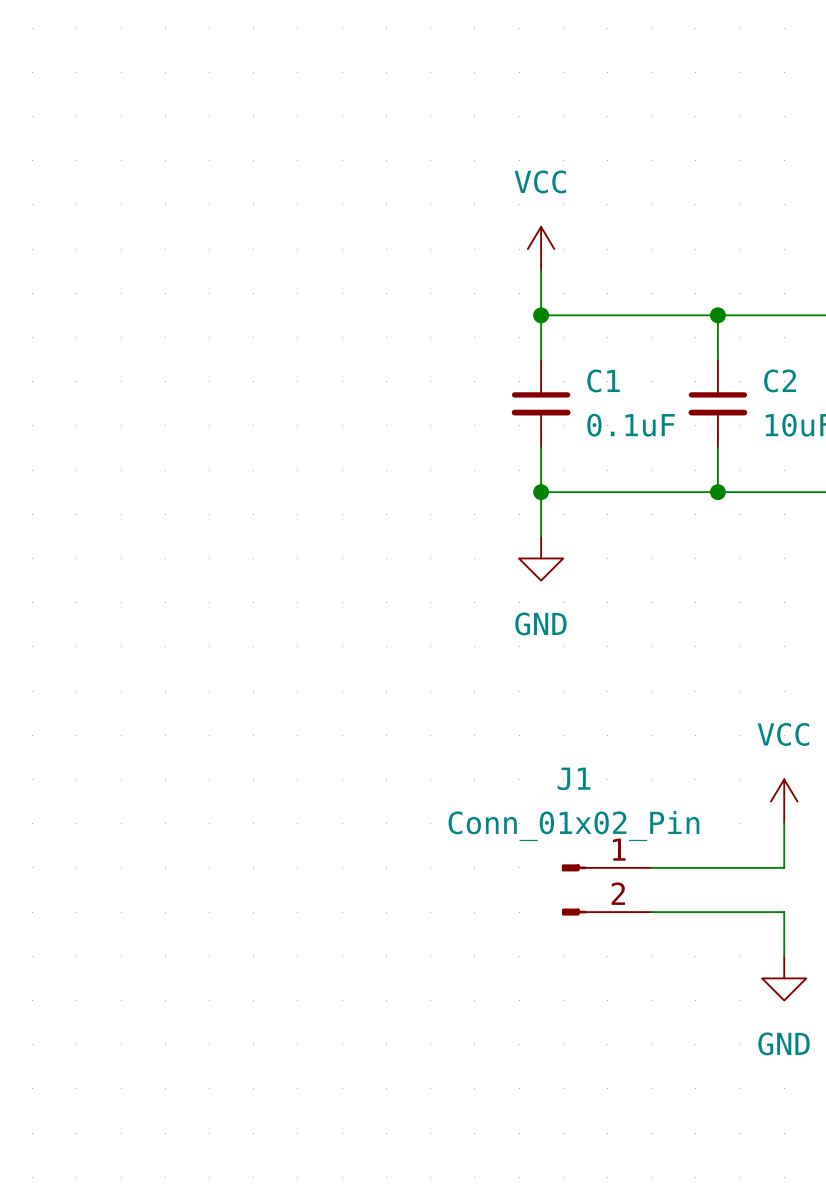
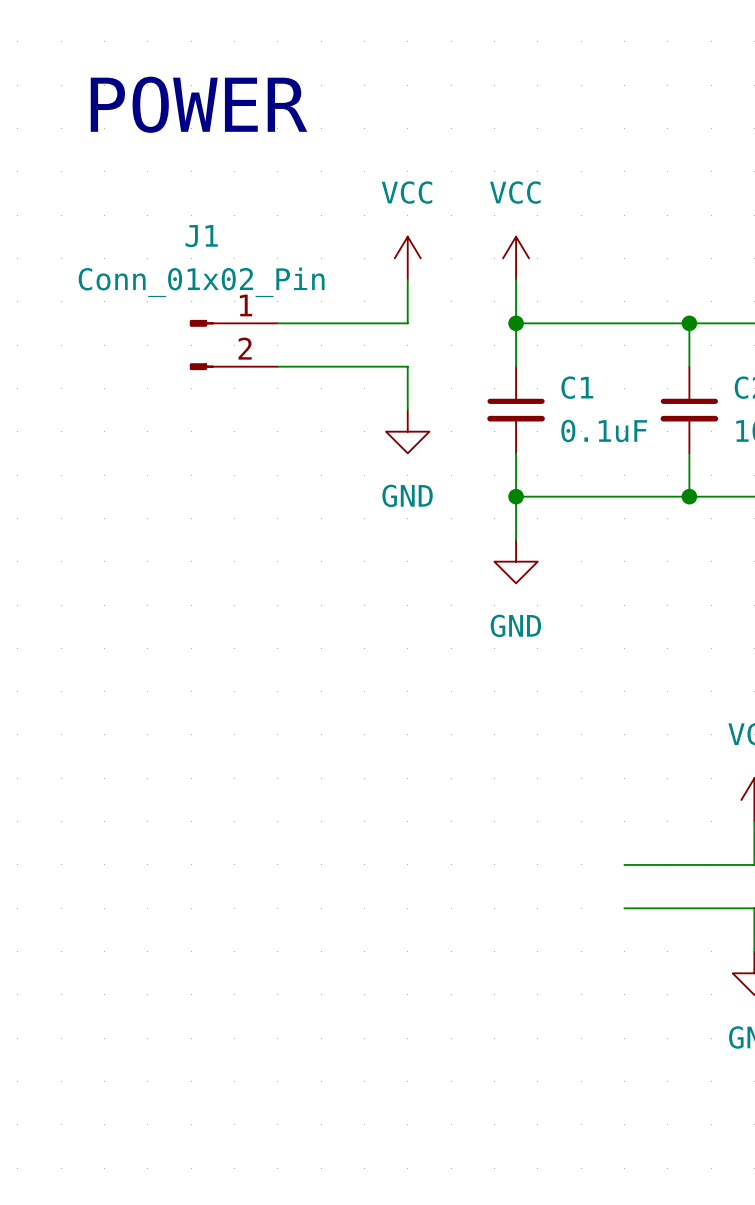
text: none -> POWER (198, 104)
power symbol: none -> VCC (407, 258)
wire: none -> (407, 280) (407, 323) (277, 323)
wire: none -> (277, 366) (407, 366) (407, 410)
power symbol: none -> GND (407, 431)
J1 position: (606, 889) -> (233, 345)

